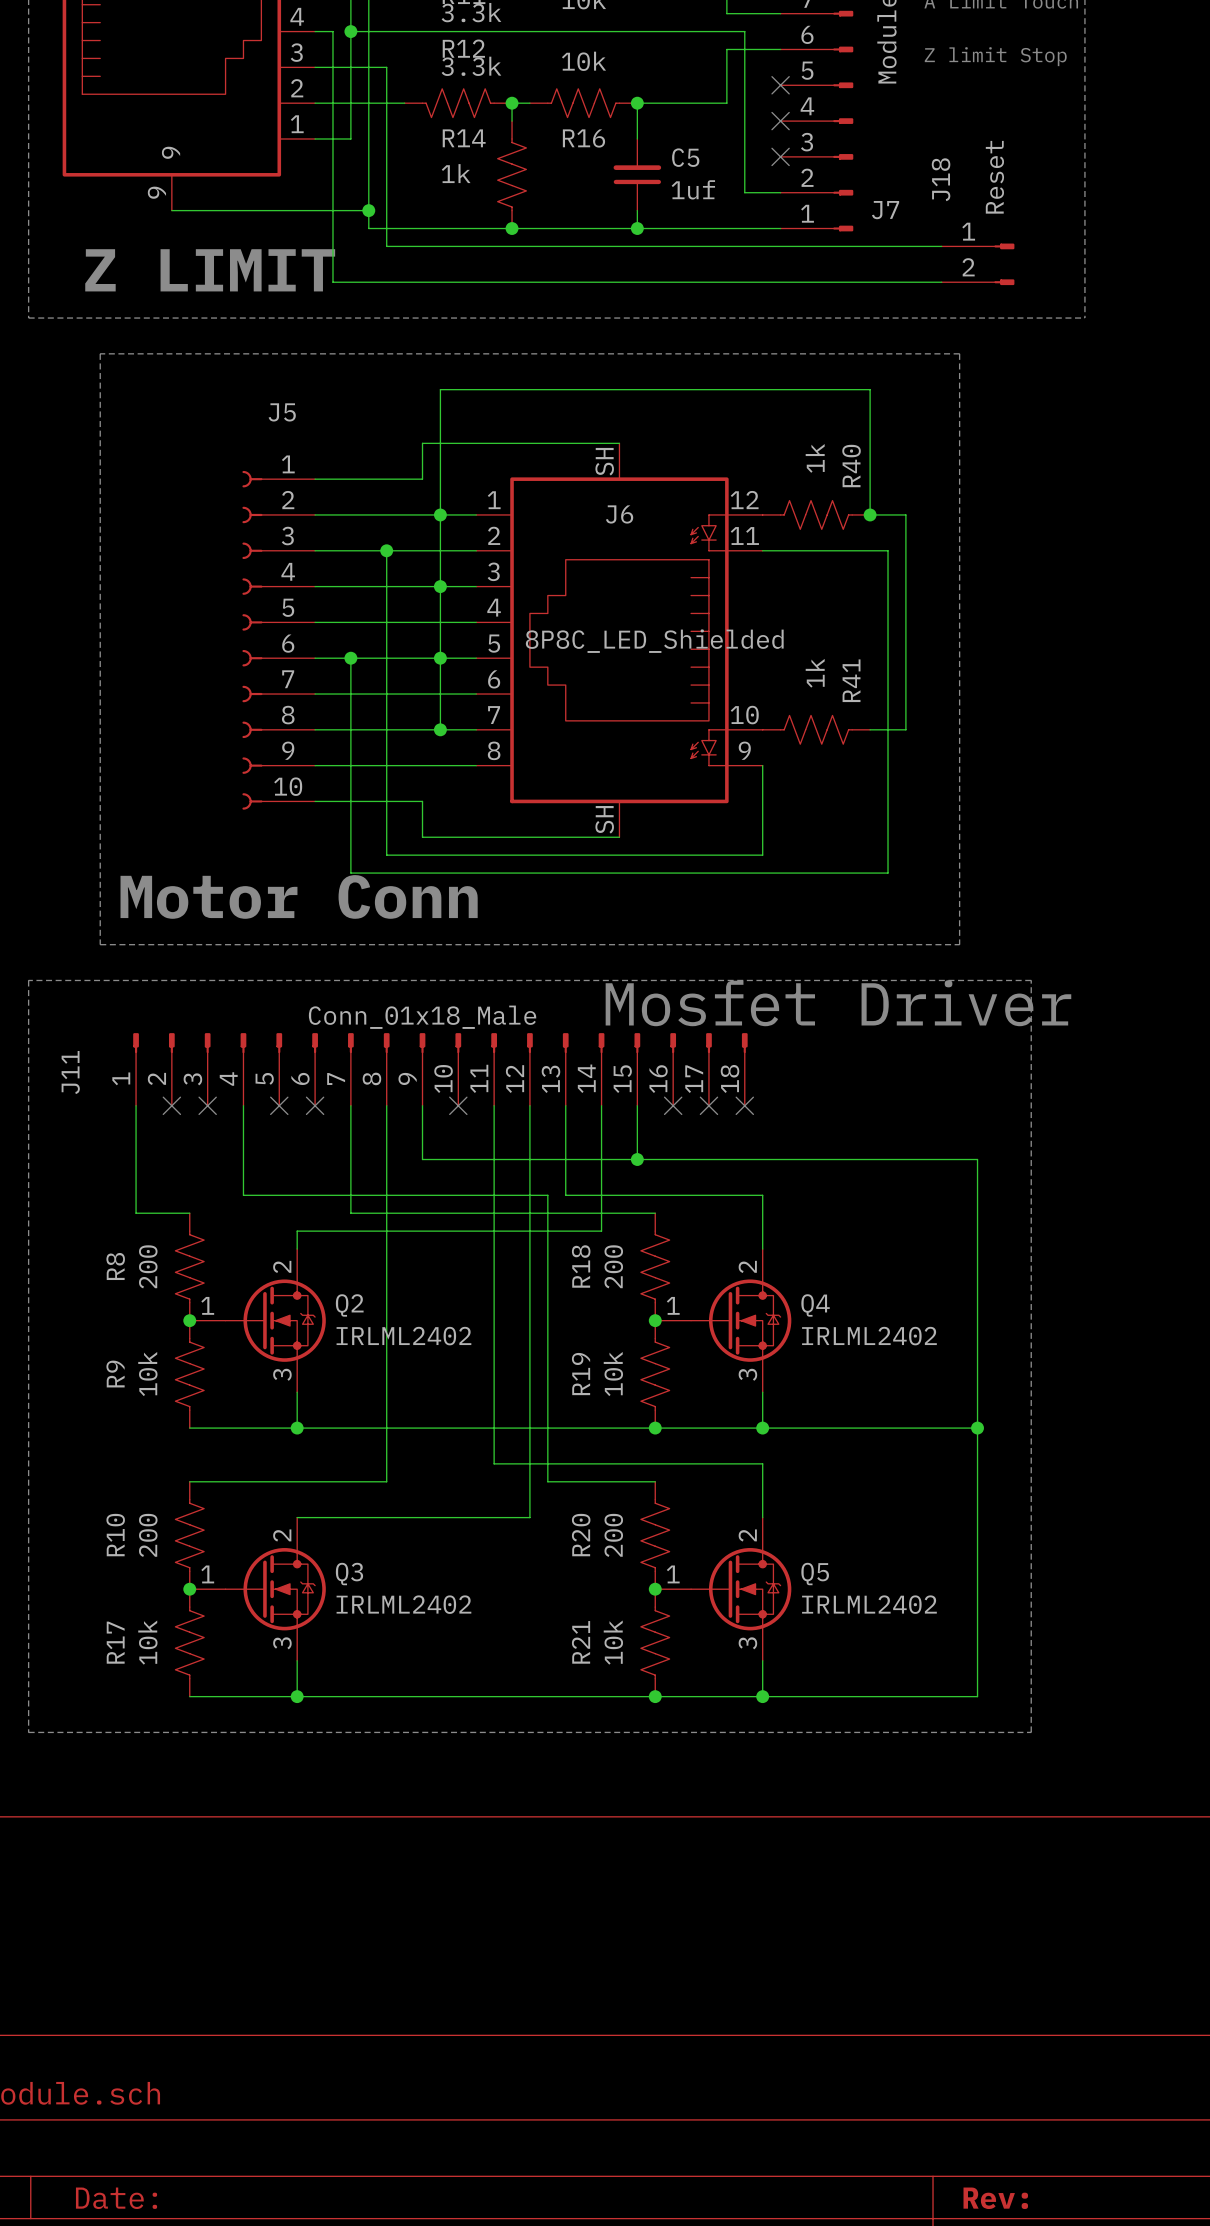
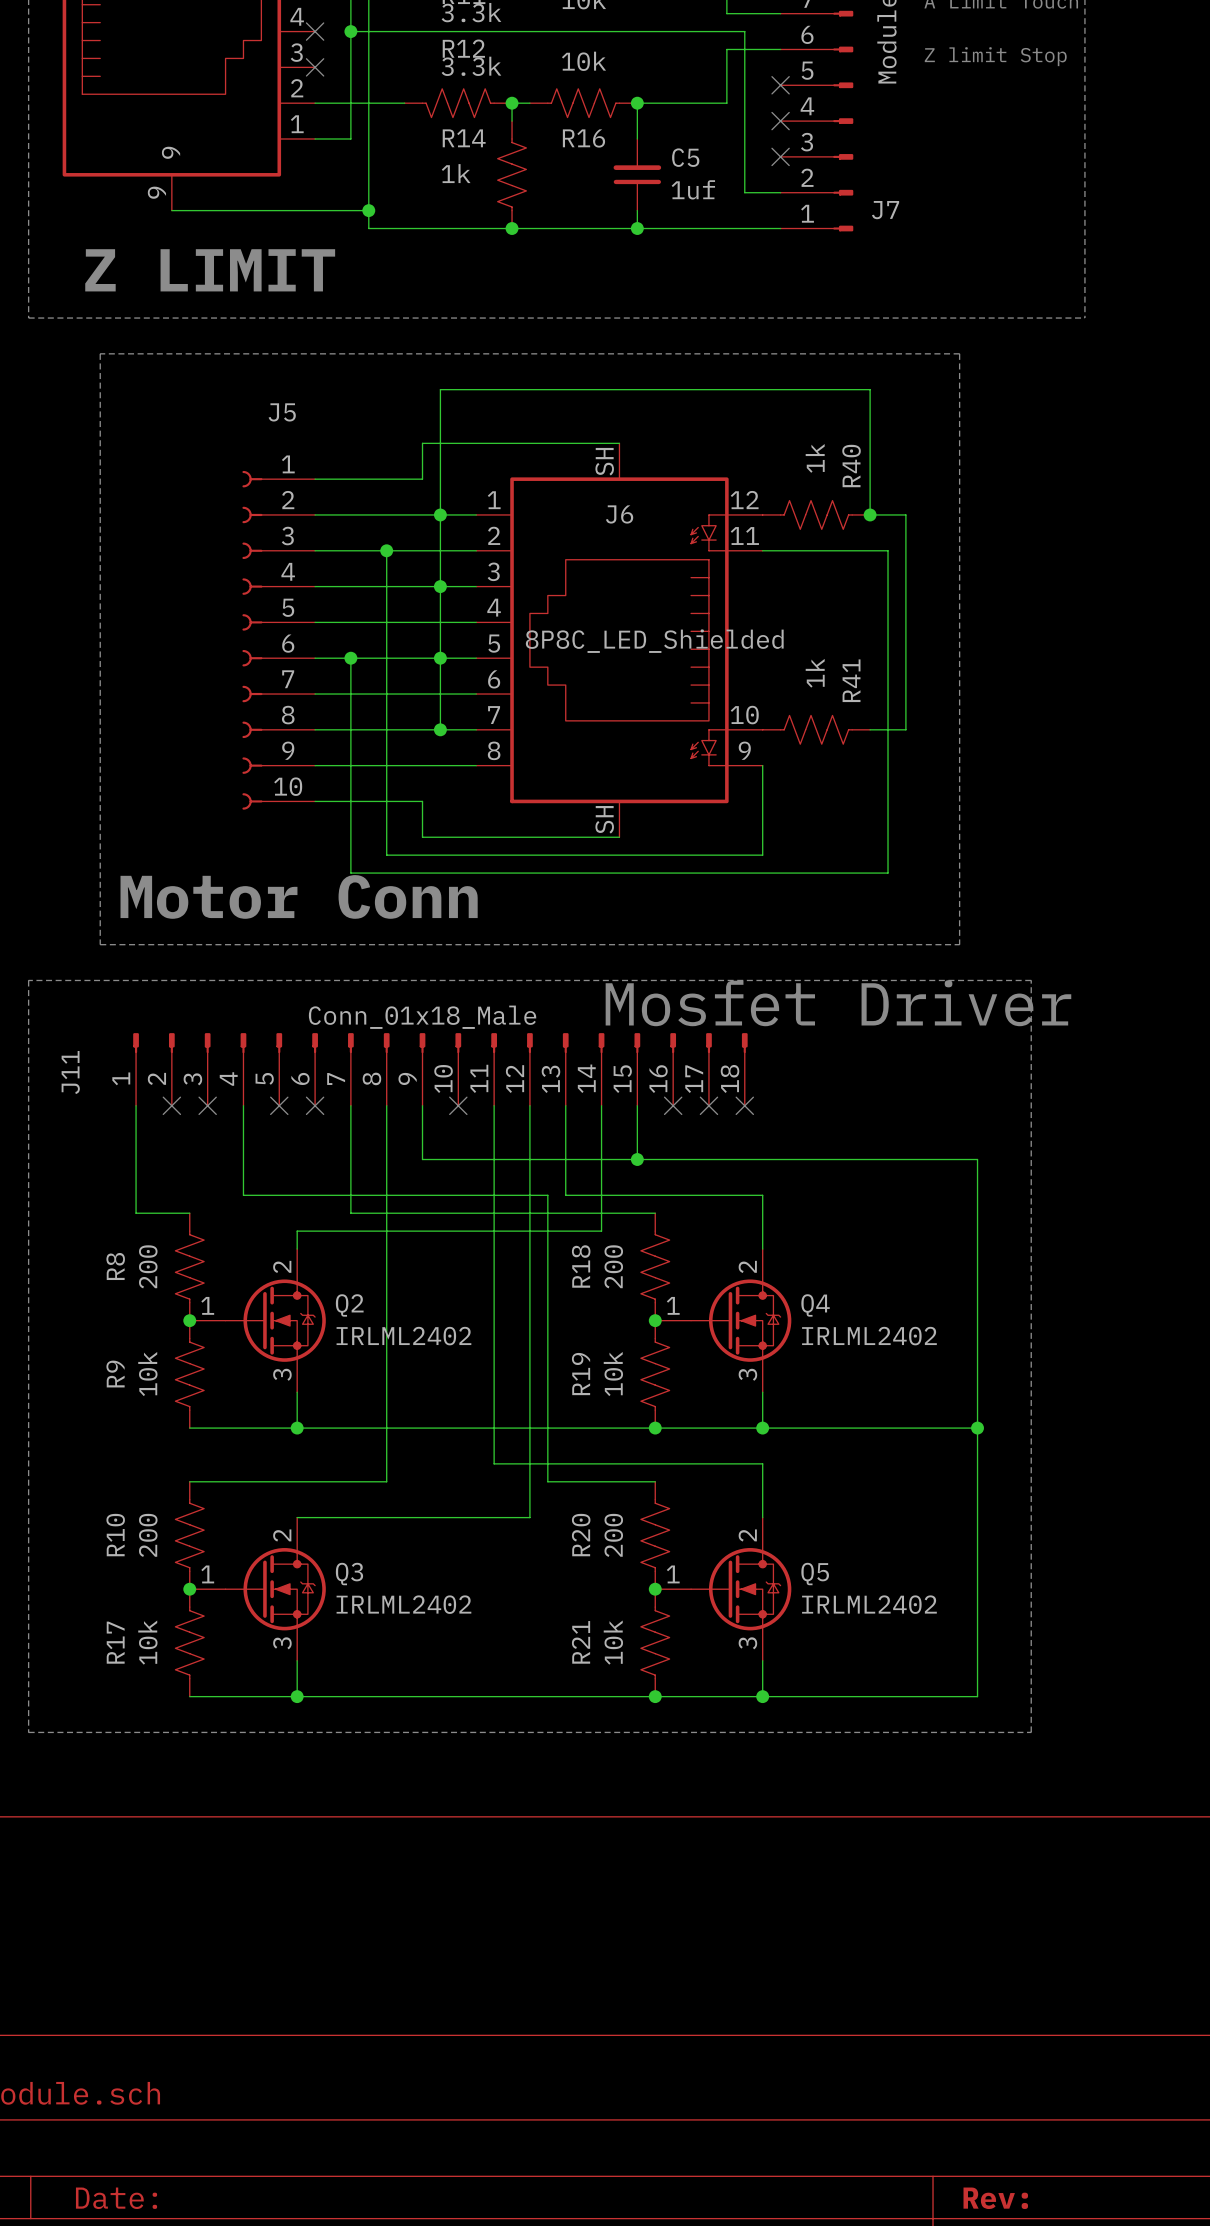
wire: (315, 31) (332, 31) (332, 282) (941, 282) -> none
no-connect mark: none -> (315, 31)
wire: (315, 67) (386, 67) (386, 246) (941, 246) -> none
no-connect mark: none -> (315, 67)
J18: Reset (978, 264) -> none

